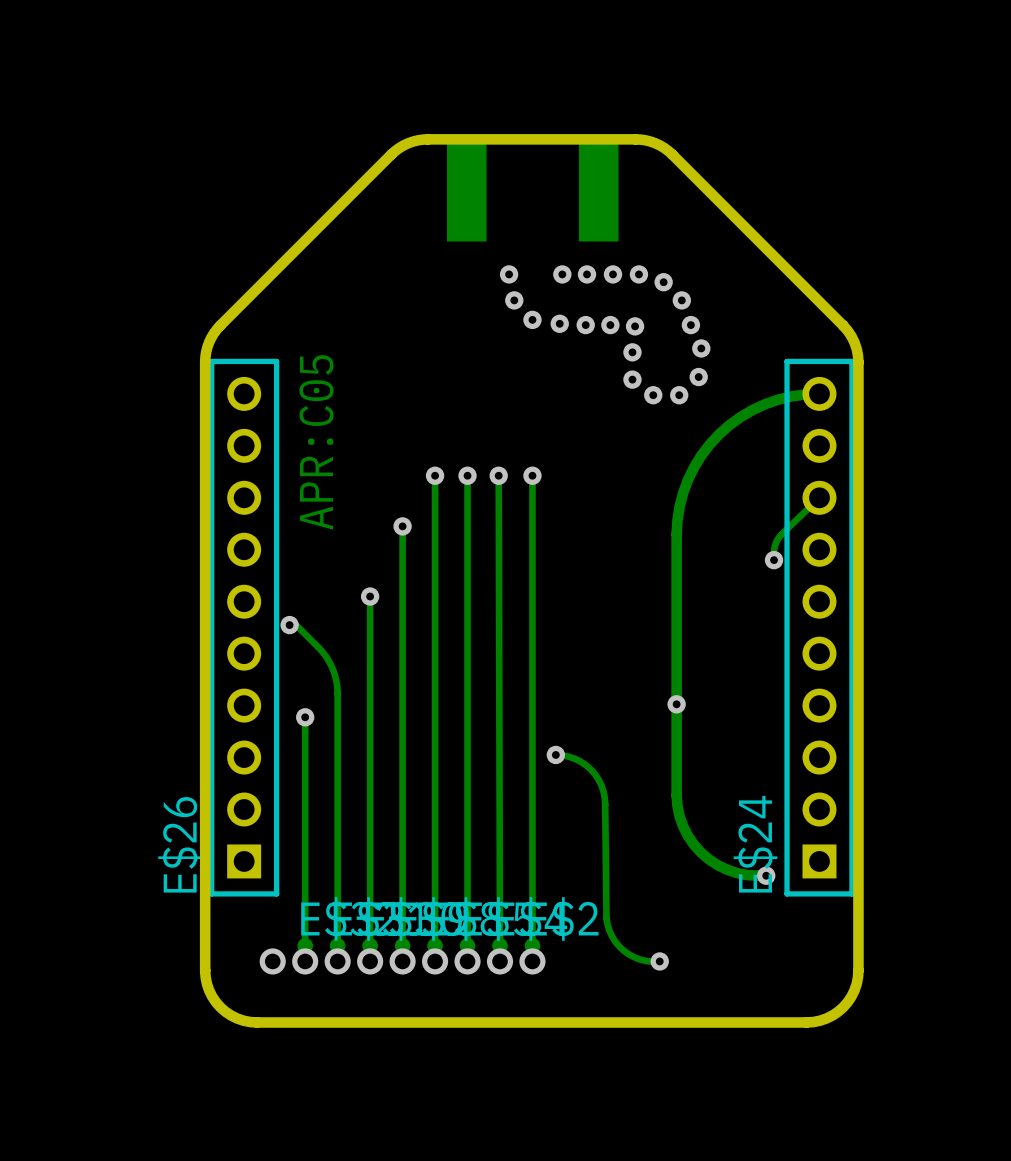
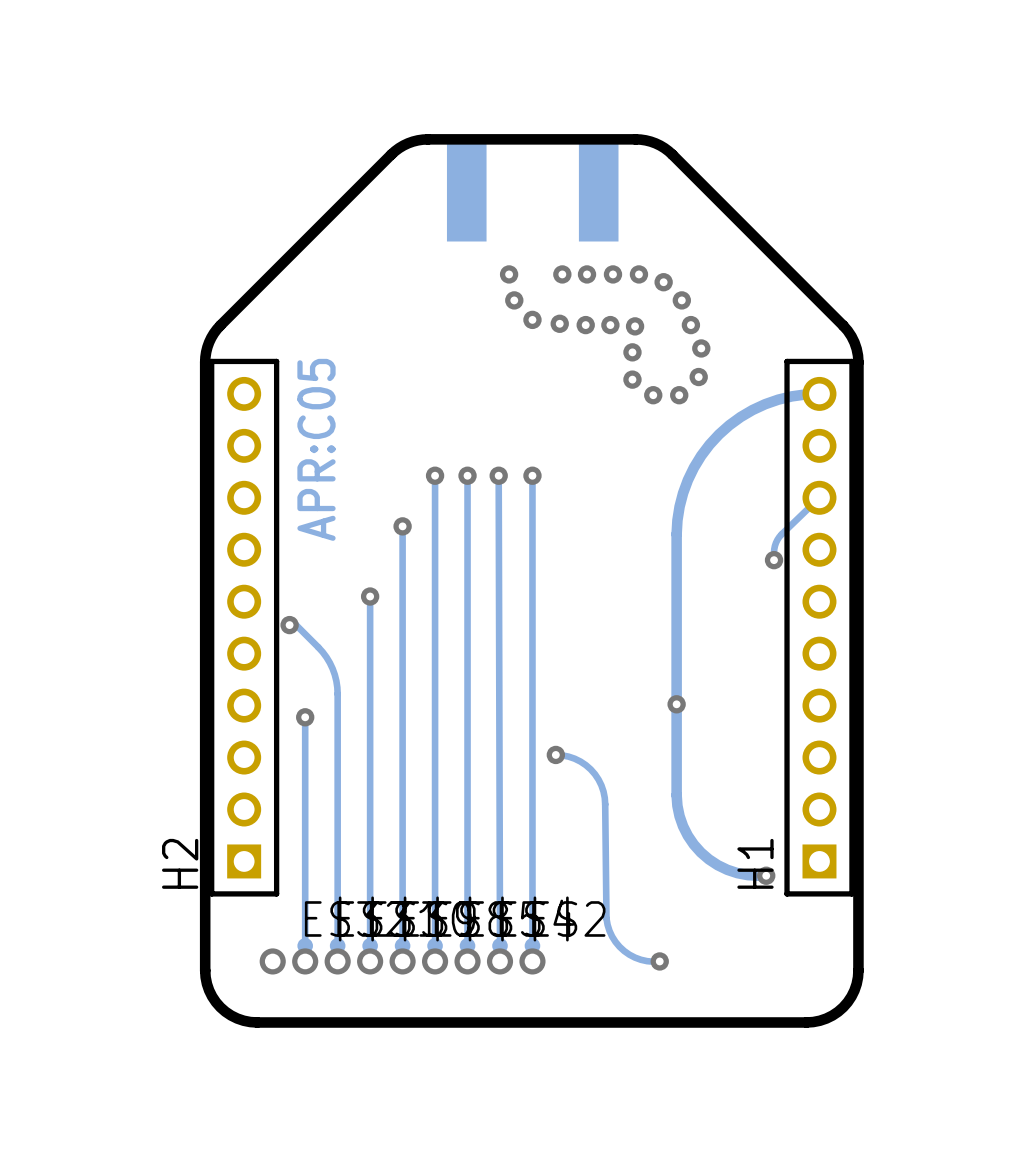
E$26 name: E$26 (180, 844) -> H2 (180, 863)
E$24 name: E$24 (755, 844) -> H1 (755, 863)

